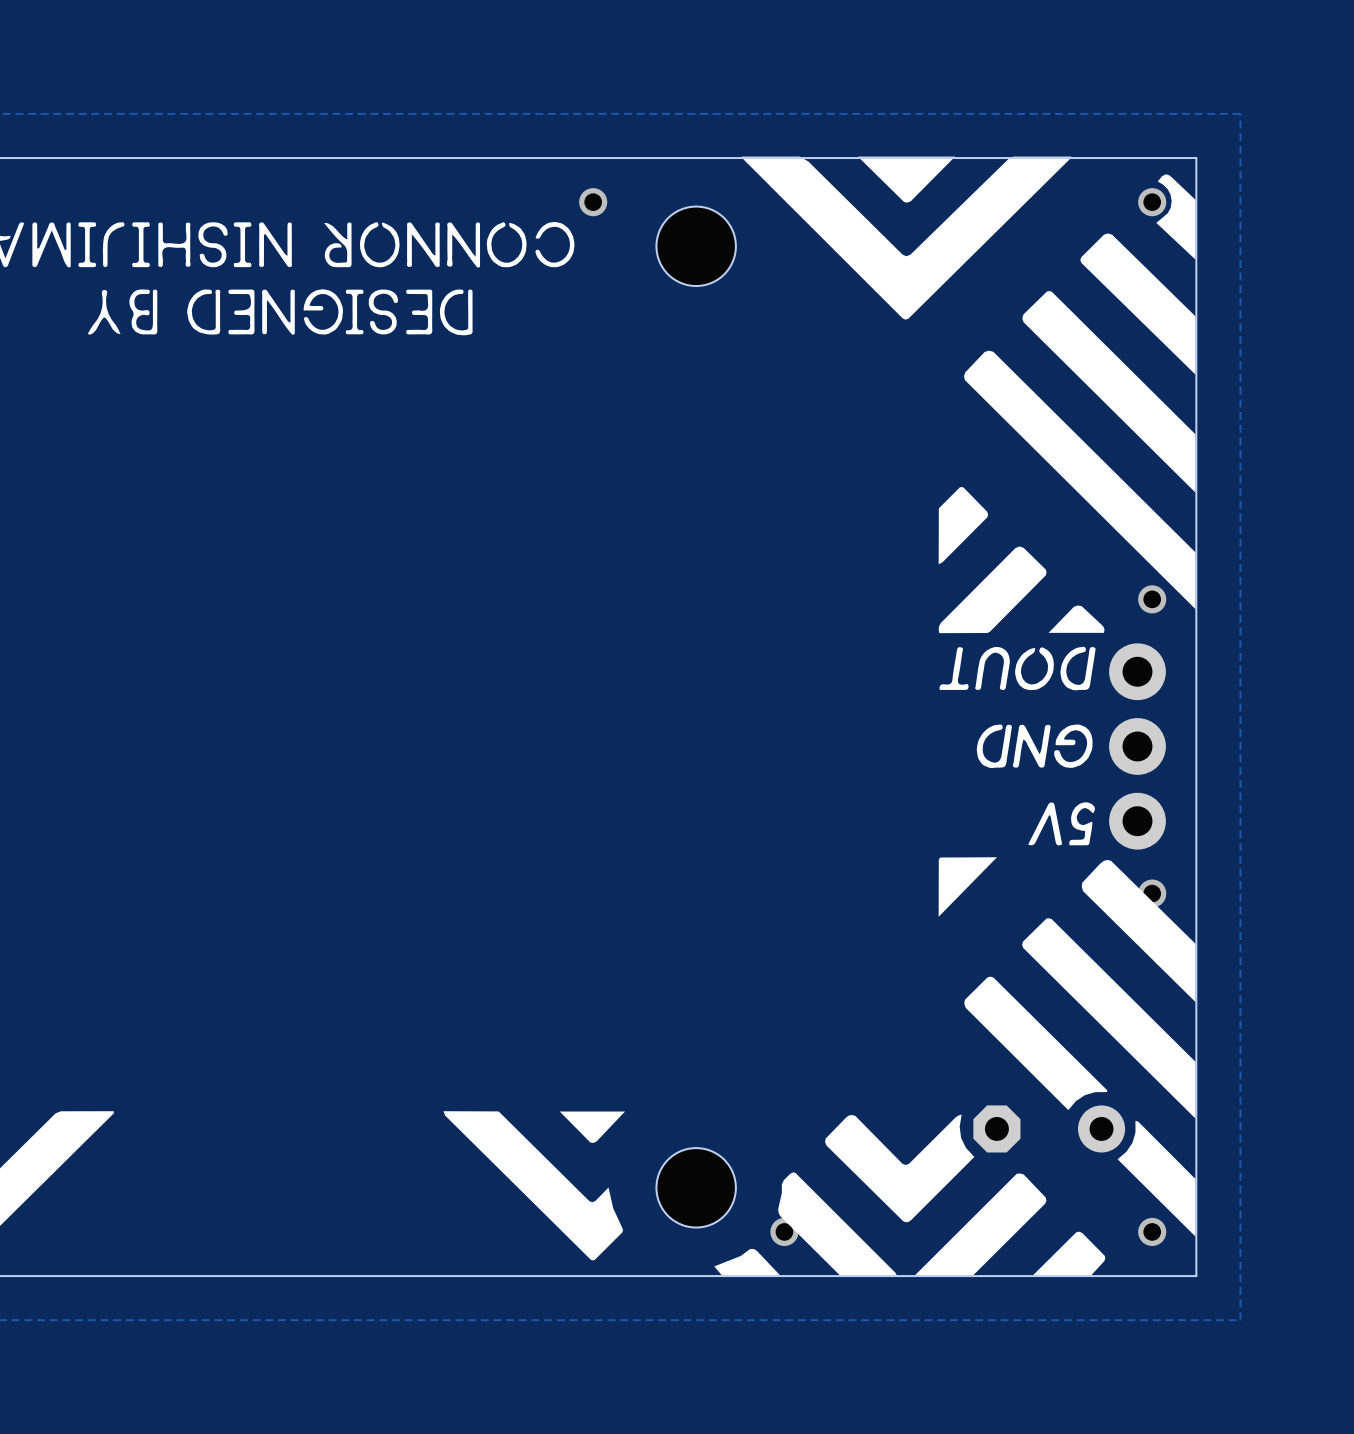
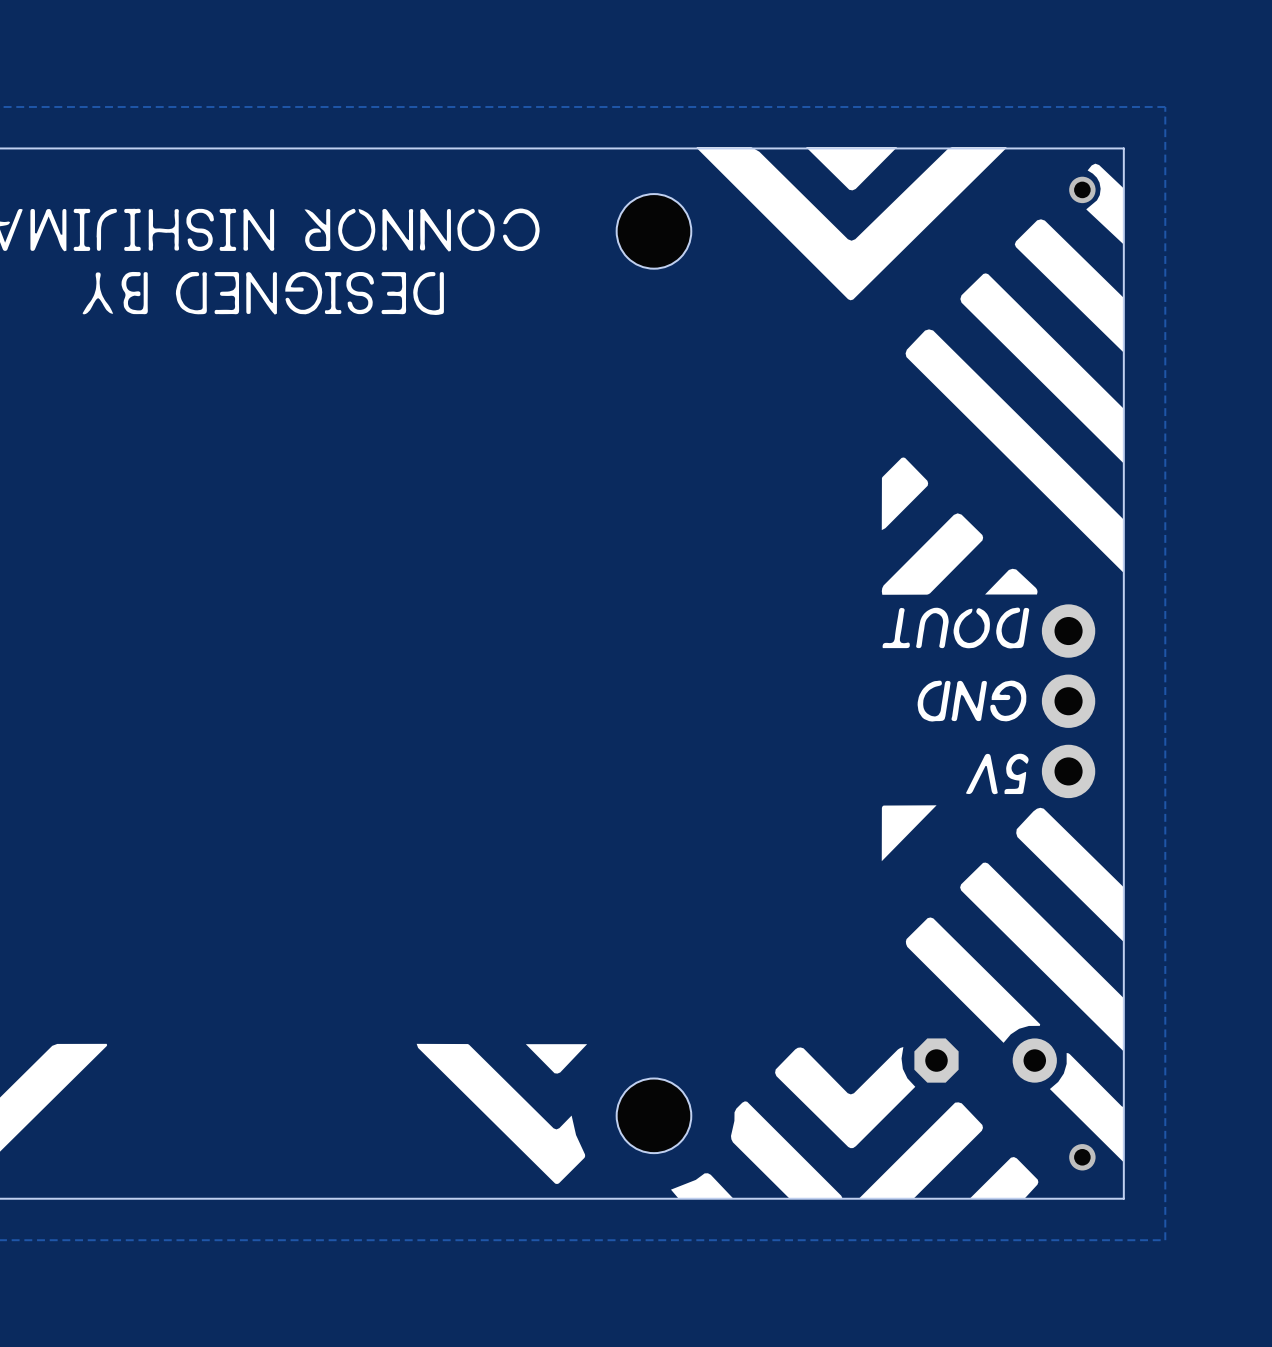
via: (593, 202) -> none
via: (1152, 599) -> none
via: (1152, 893) -> none
via: (784, 1231) -> none

